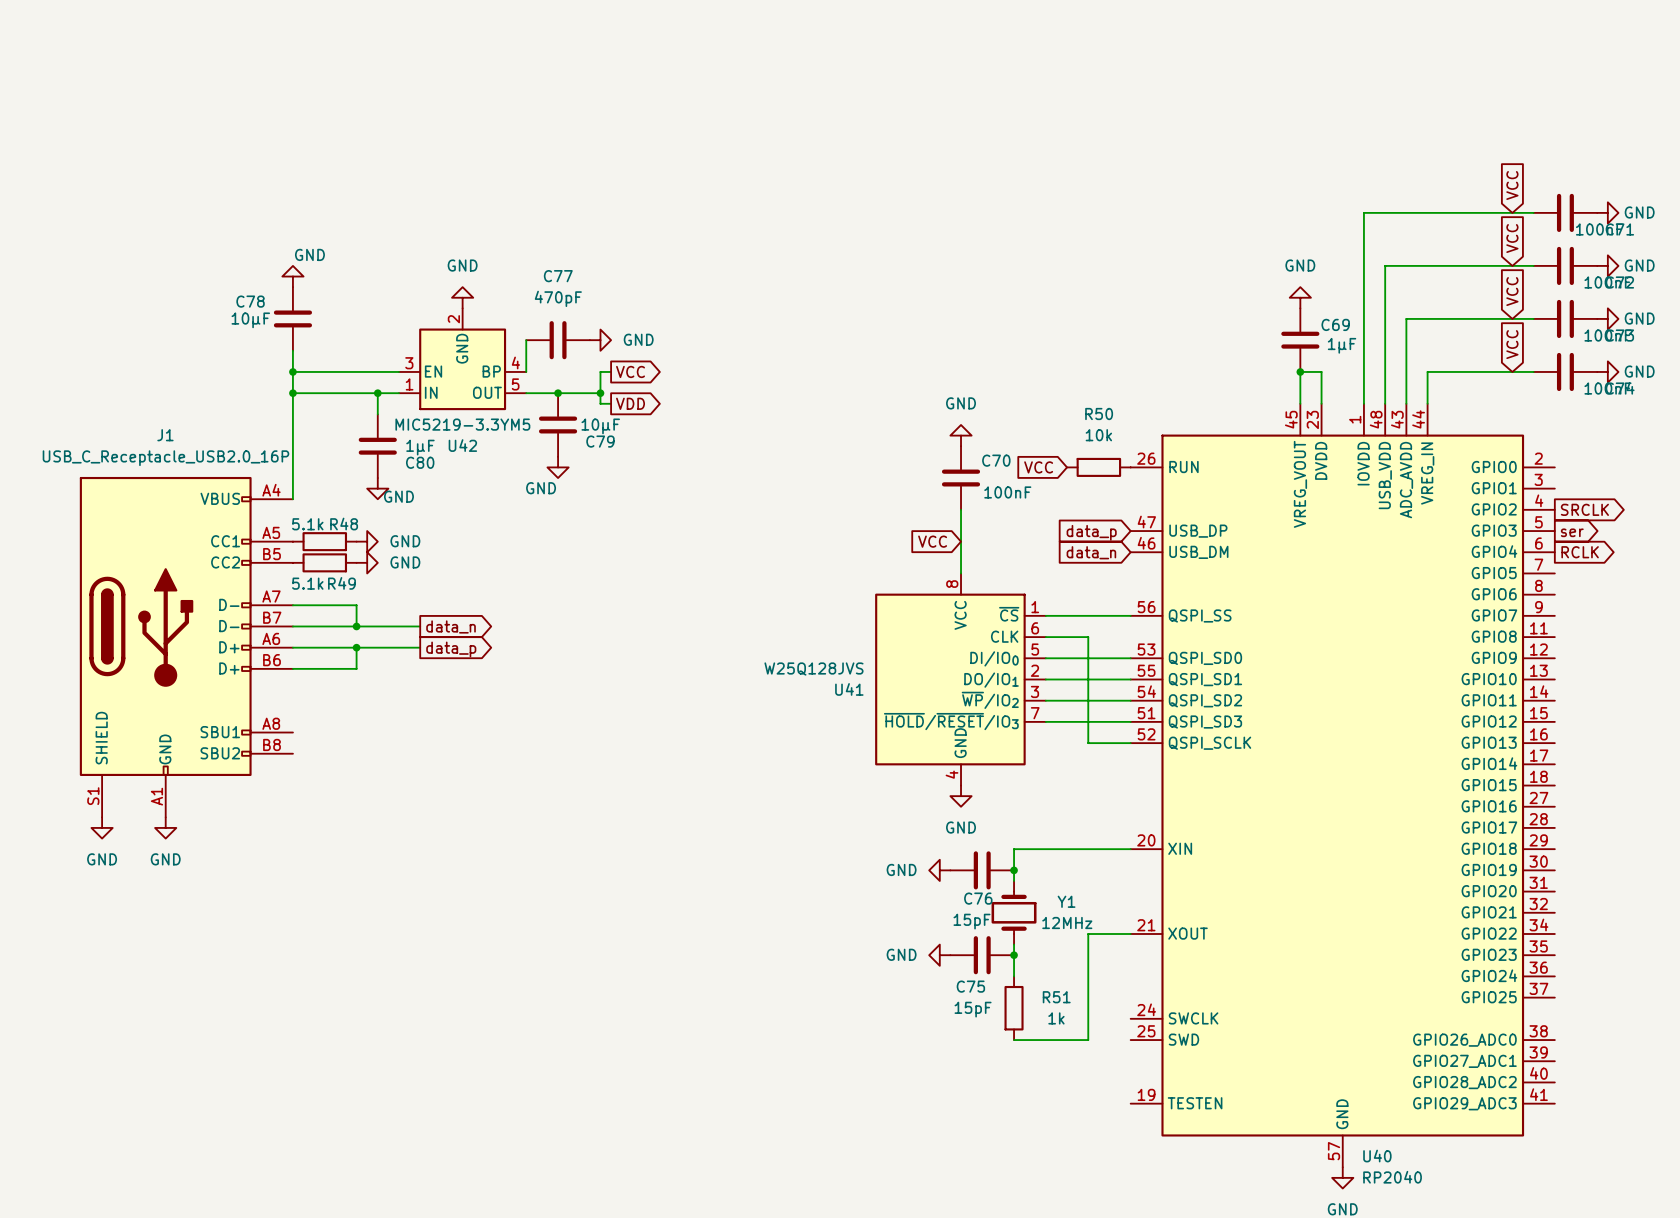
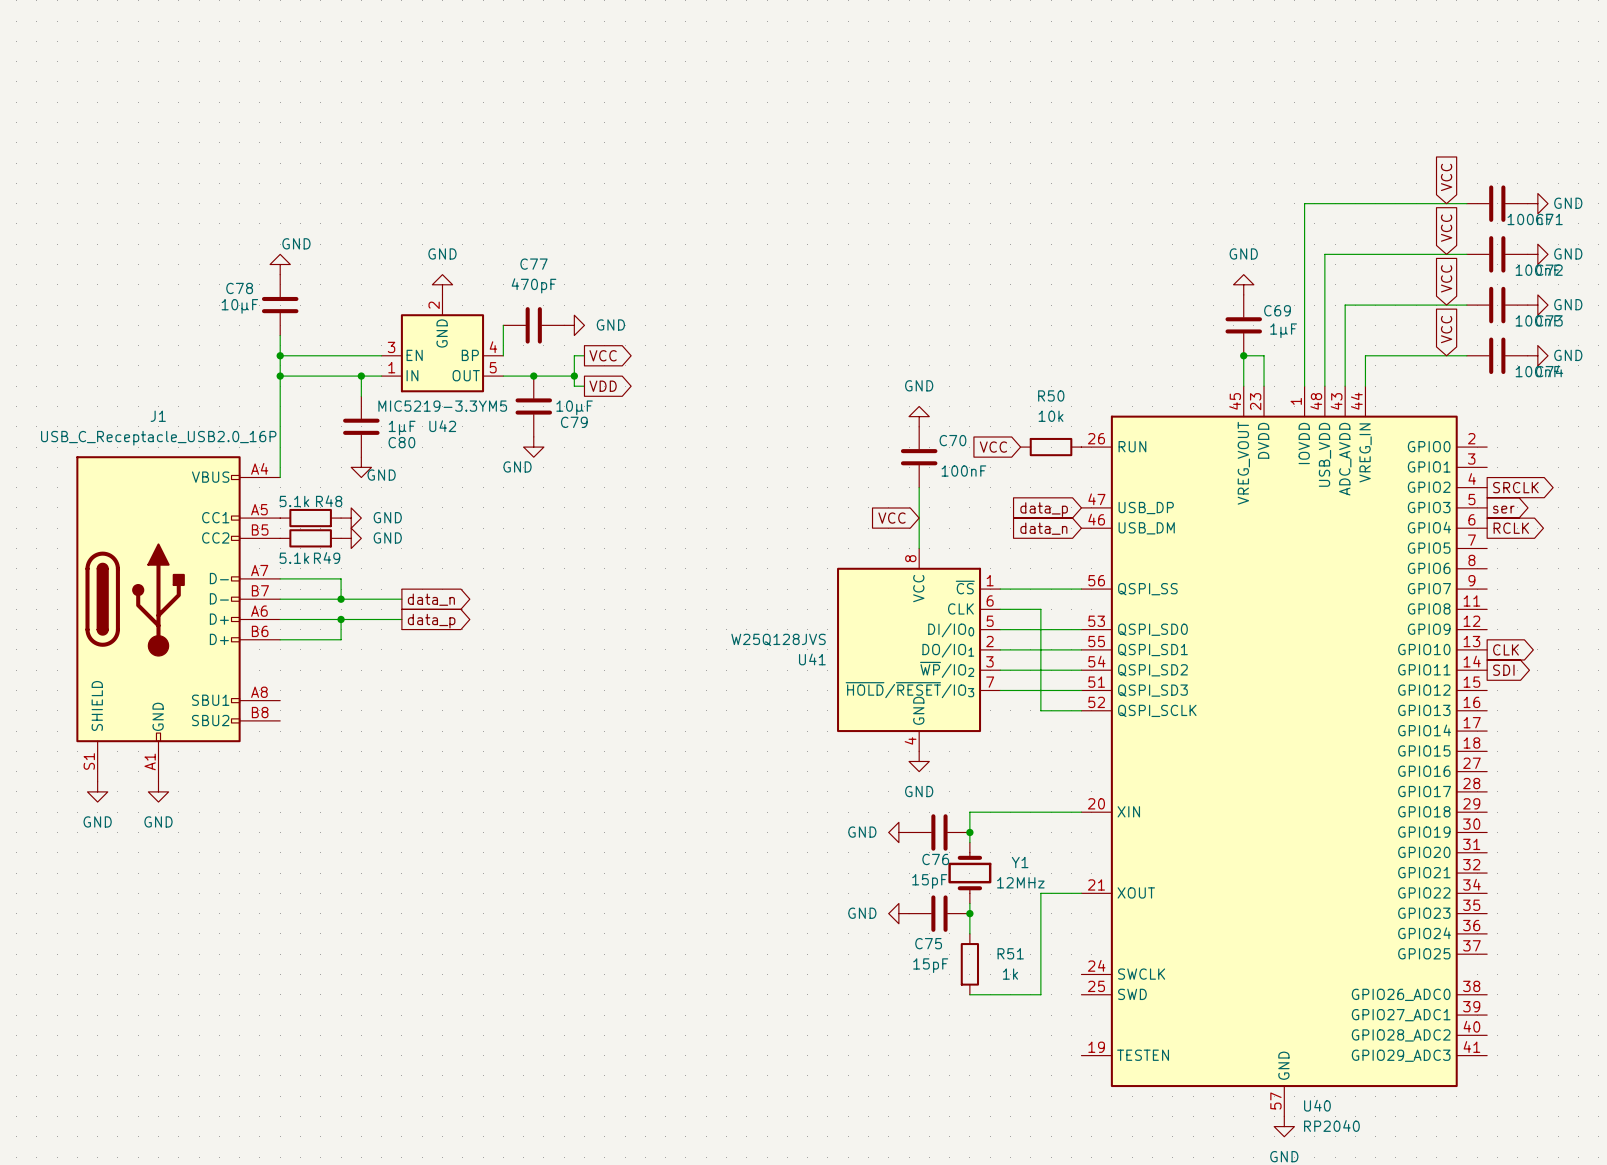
global label: none -> CLK (1506, 649)
global label: none -> SDI (1503, 670)

